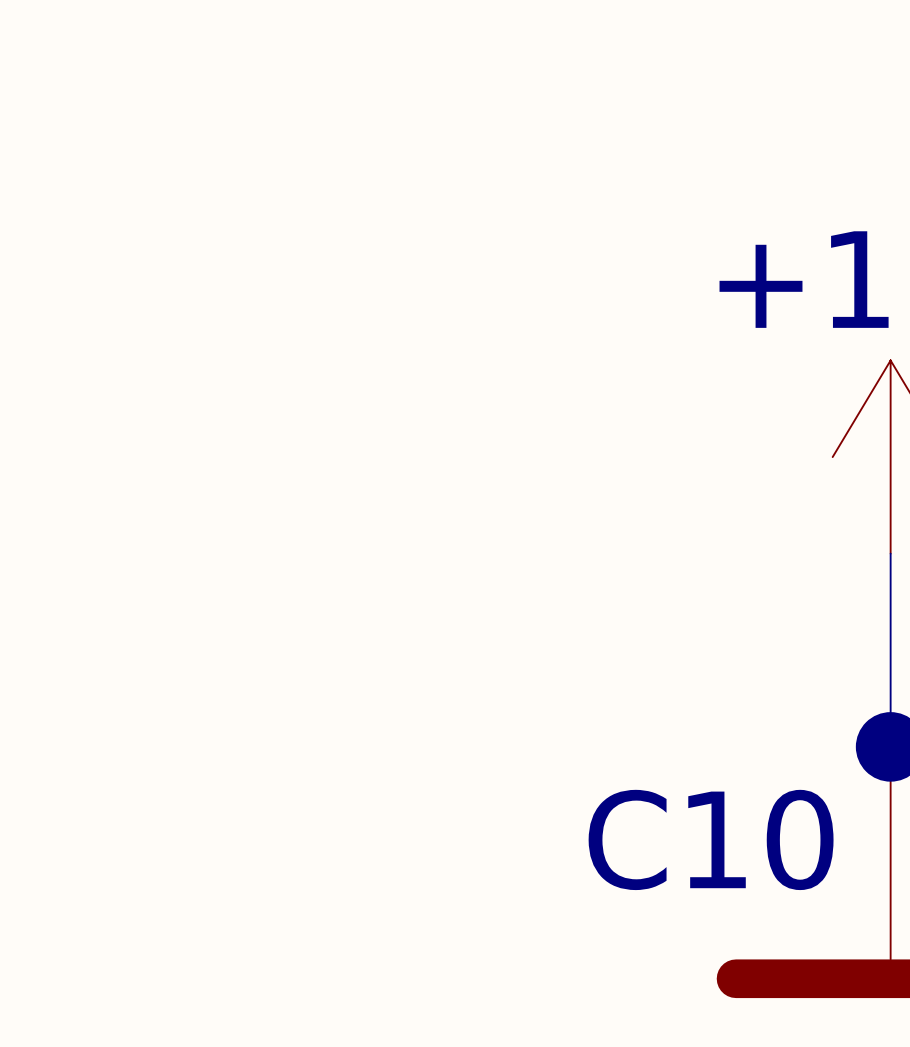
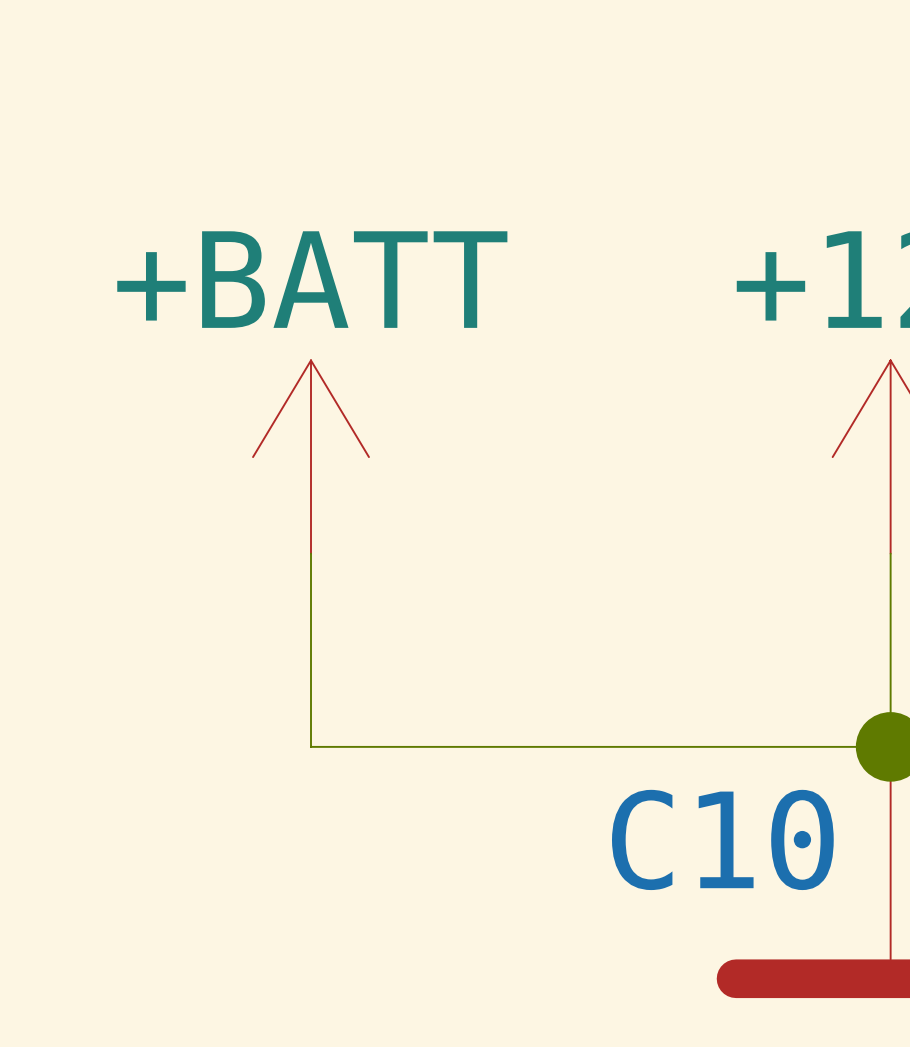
power symbol: none -> +BATT (311, 457)
wire: none -> (311, 553) (311, 746) (890, 746)

